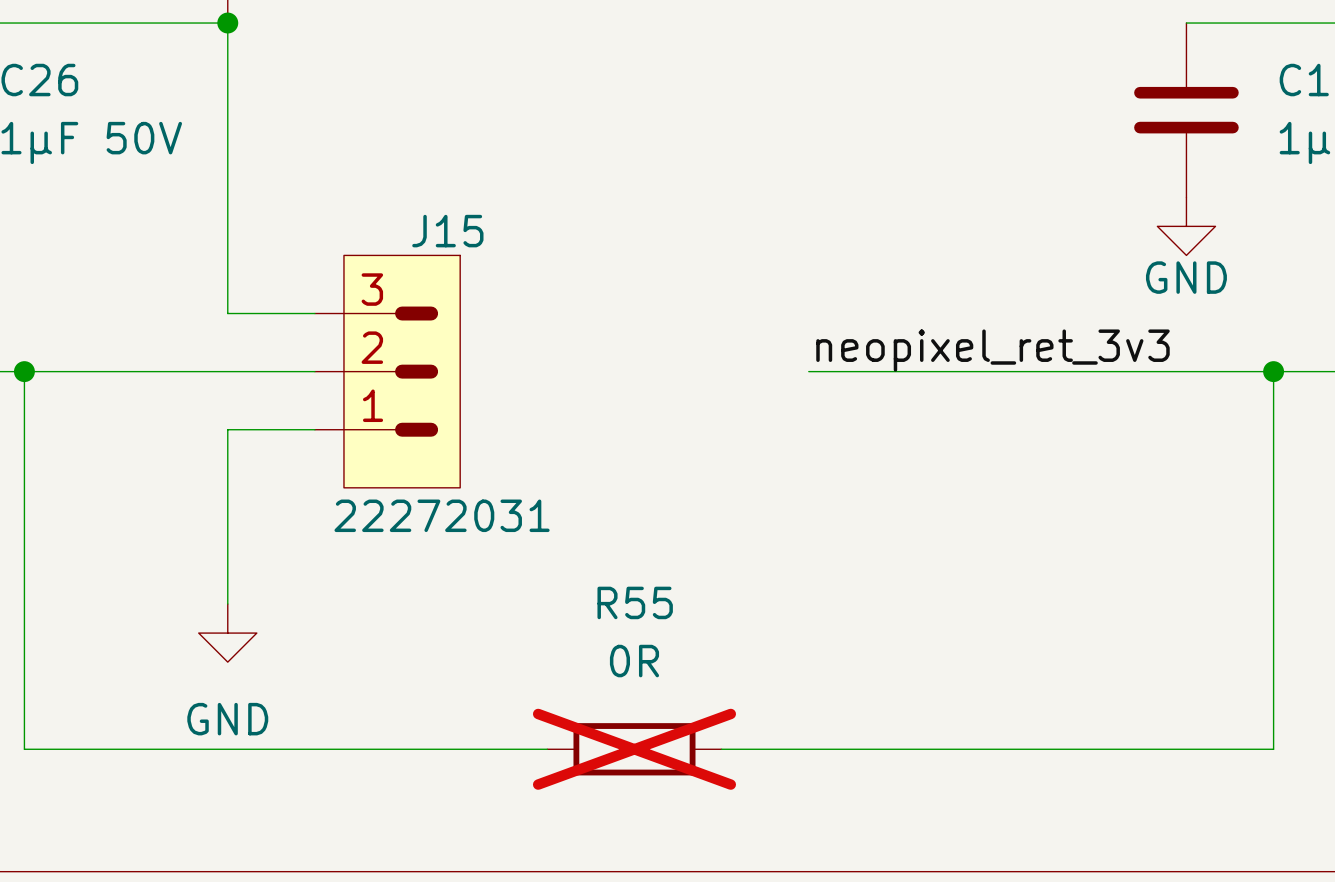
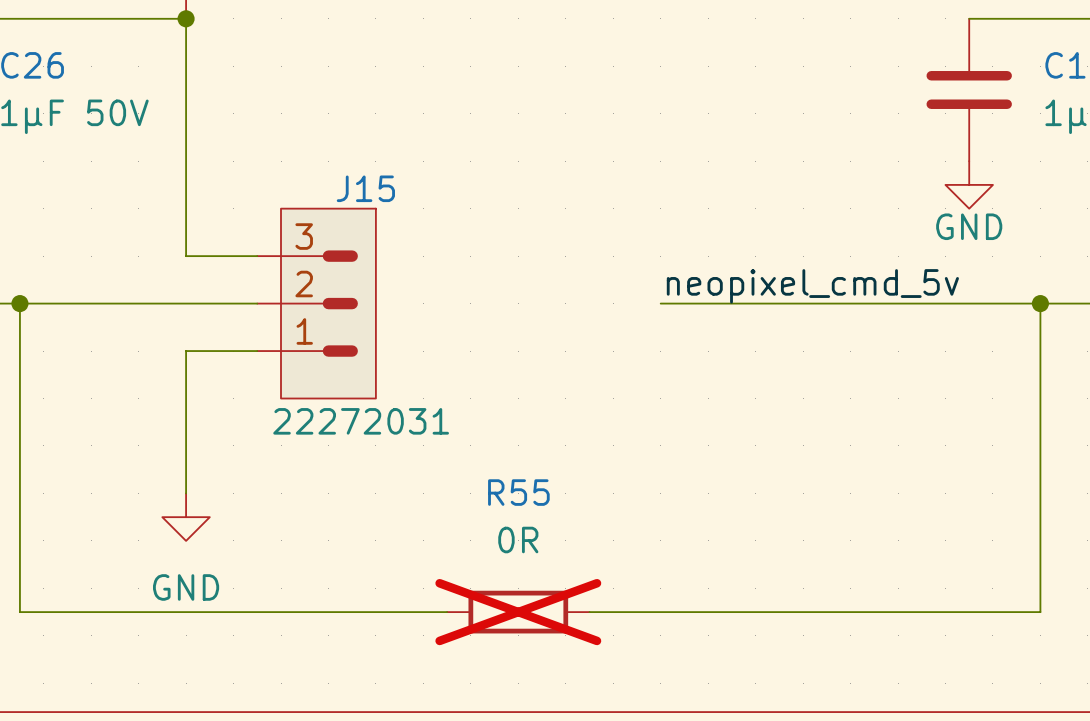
label: neopixel_ret_3v3 (992, 350) -> neopixel_cmd_5v (812, 286)

